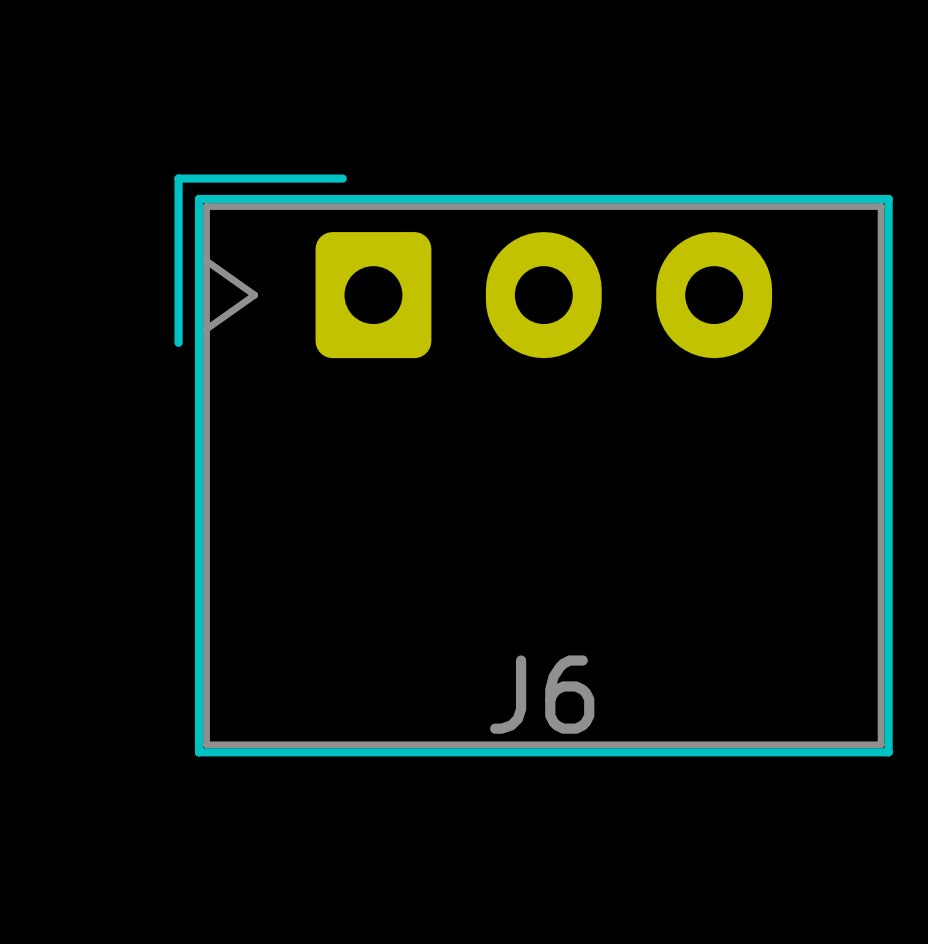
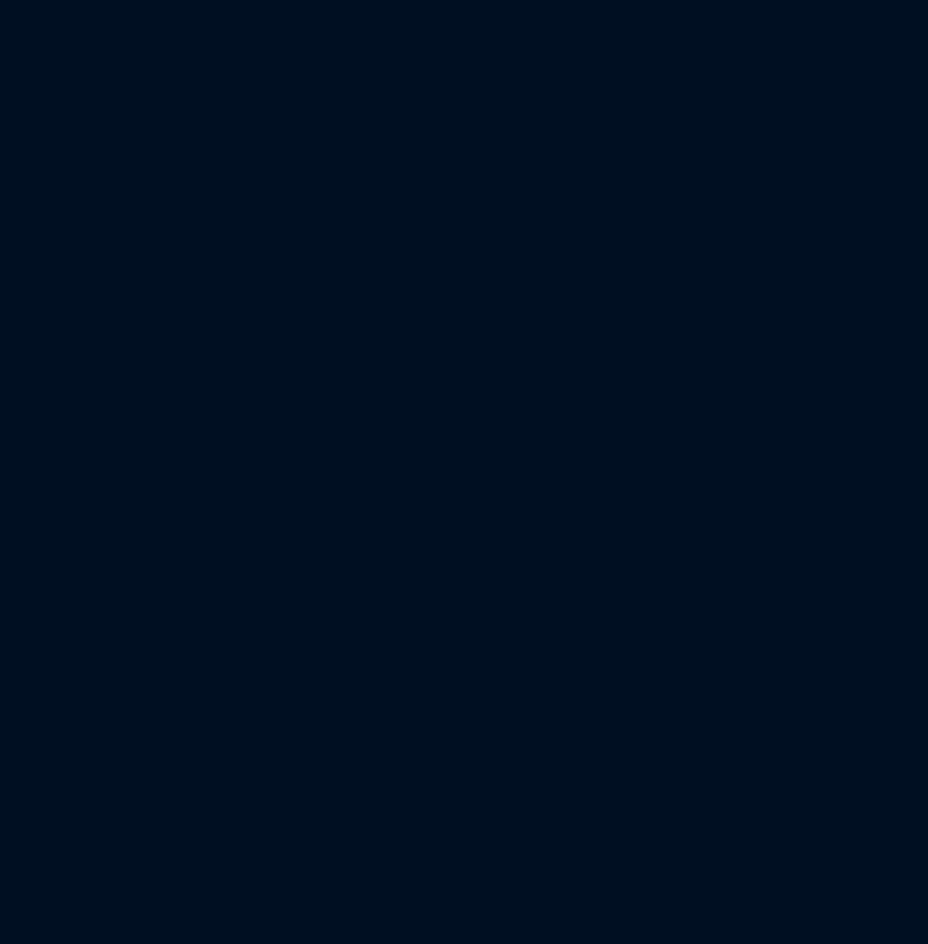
J6: (533, 465) -> none

